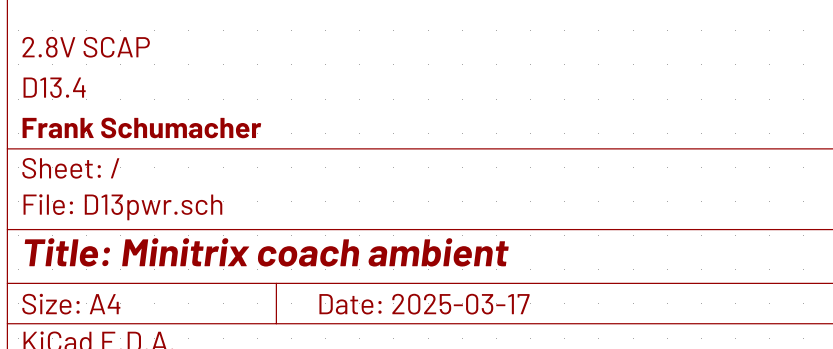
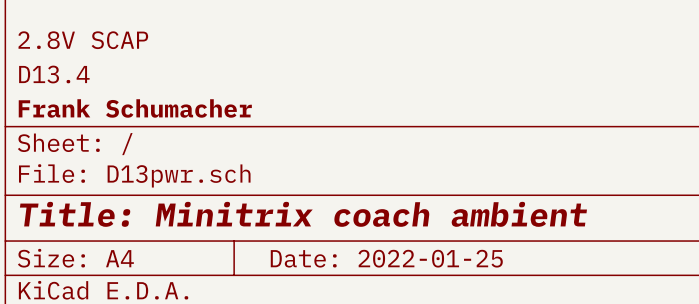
title block: Date: 2025-03-17 (424, 304) -> Date: 2022-01-25 (386, 258)

